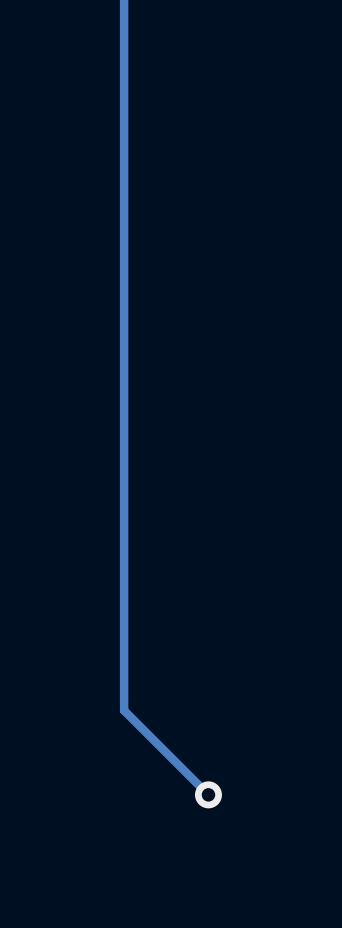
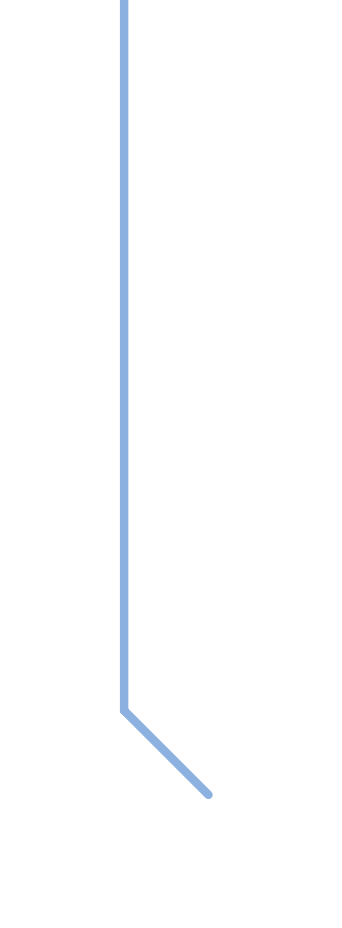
via: (208, 794) -> none

